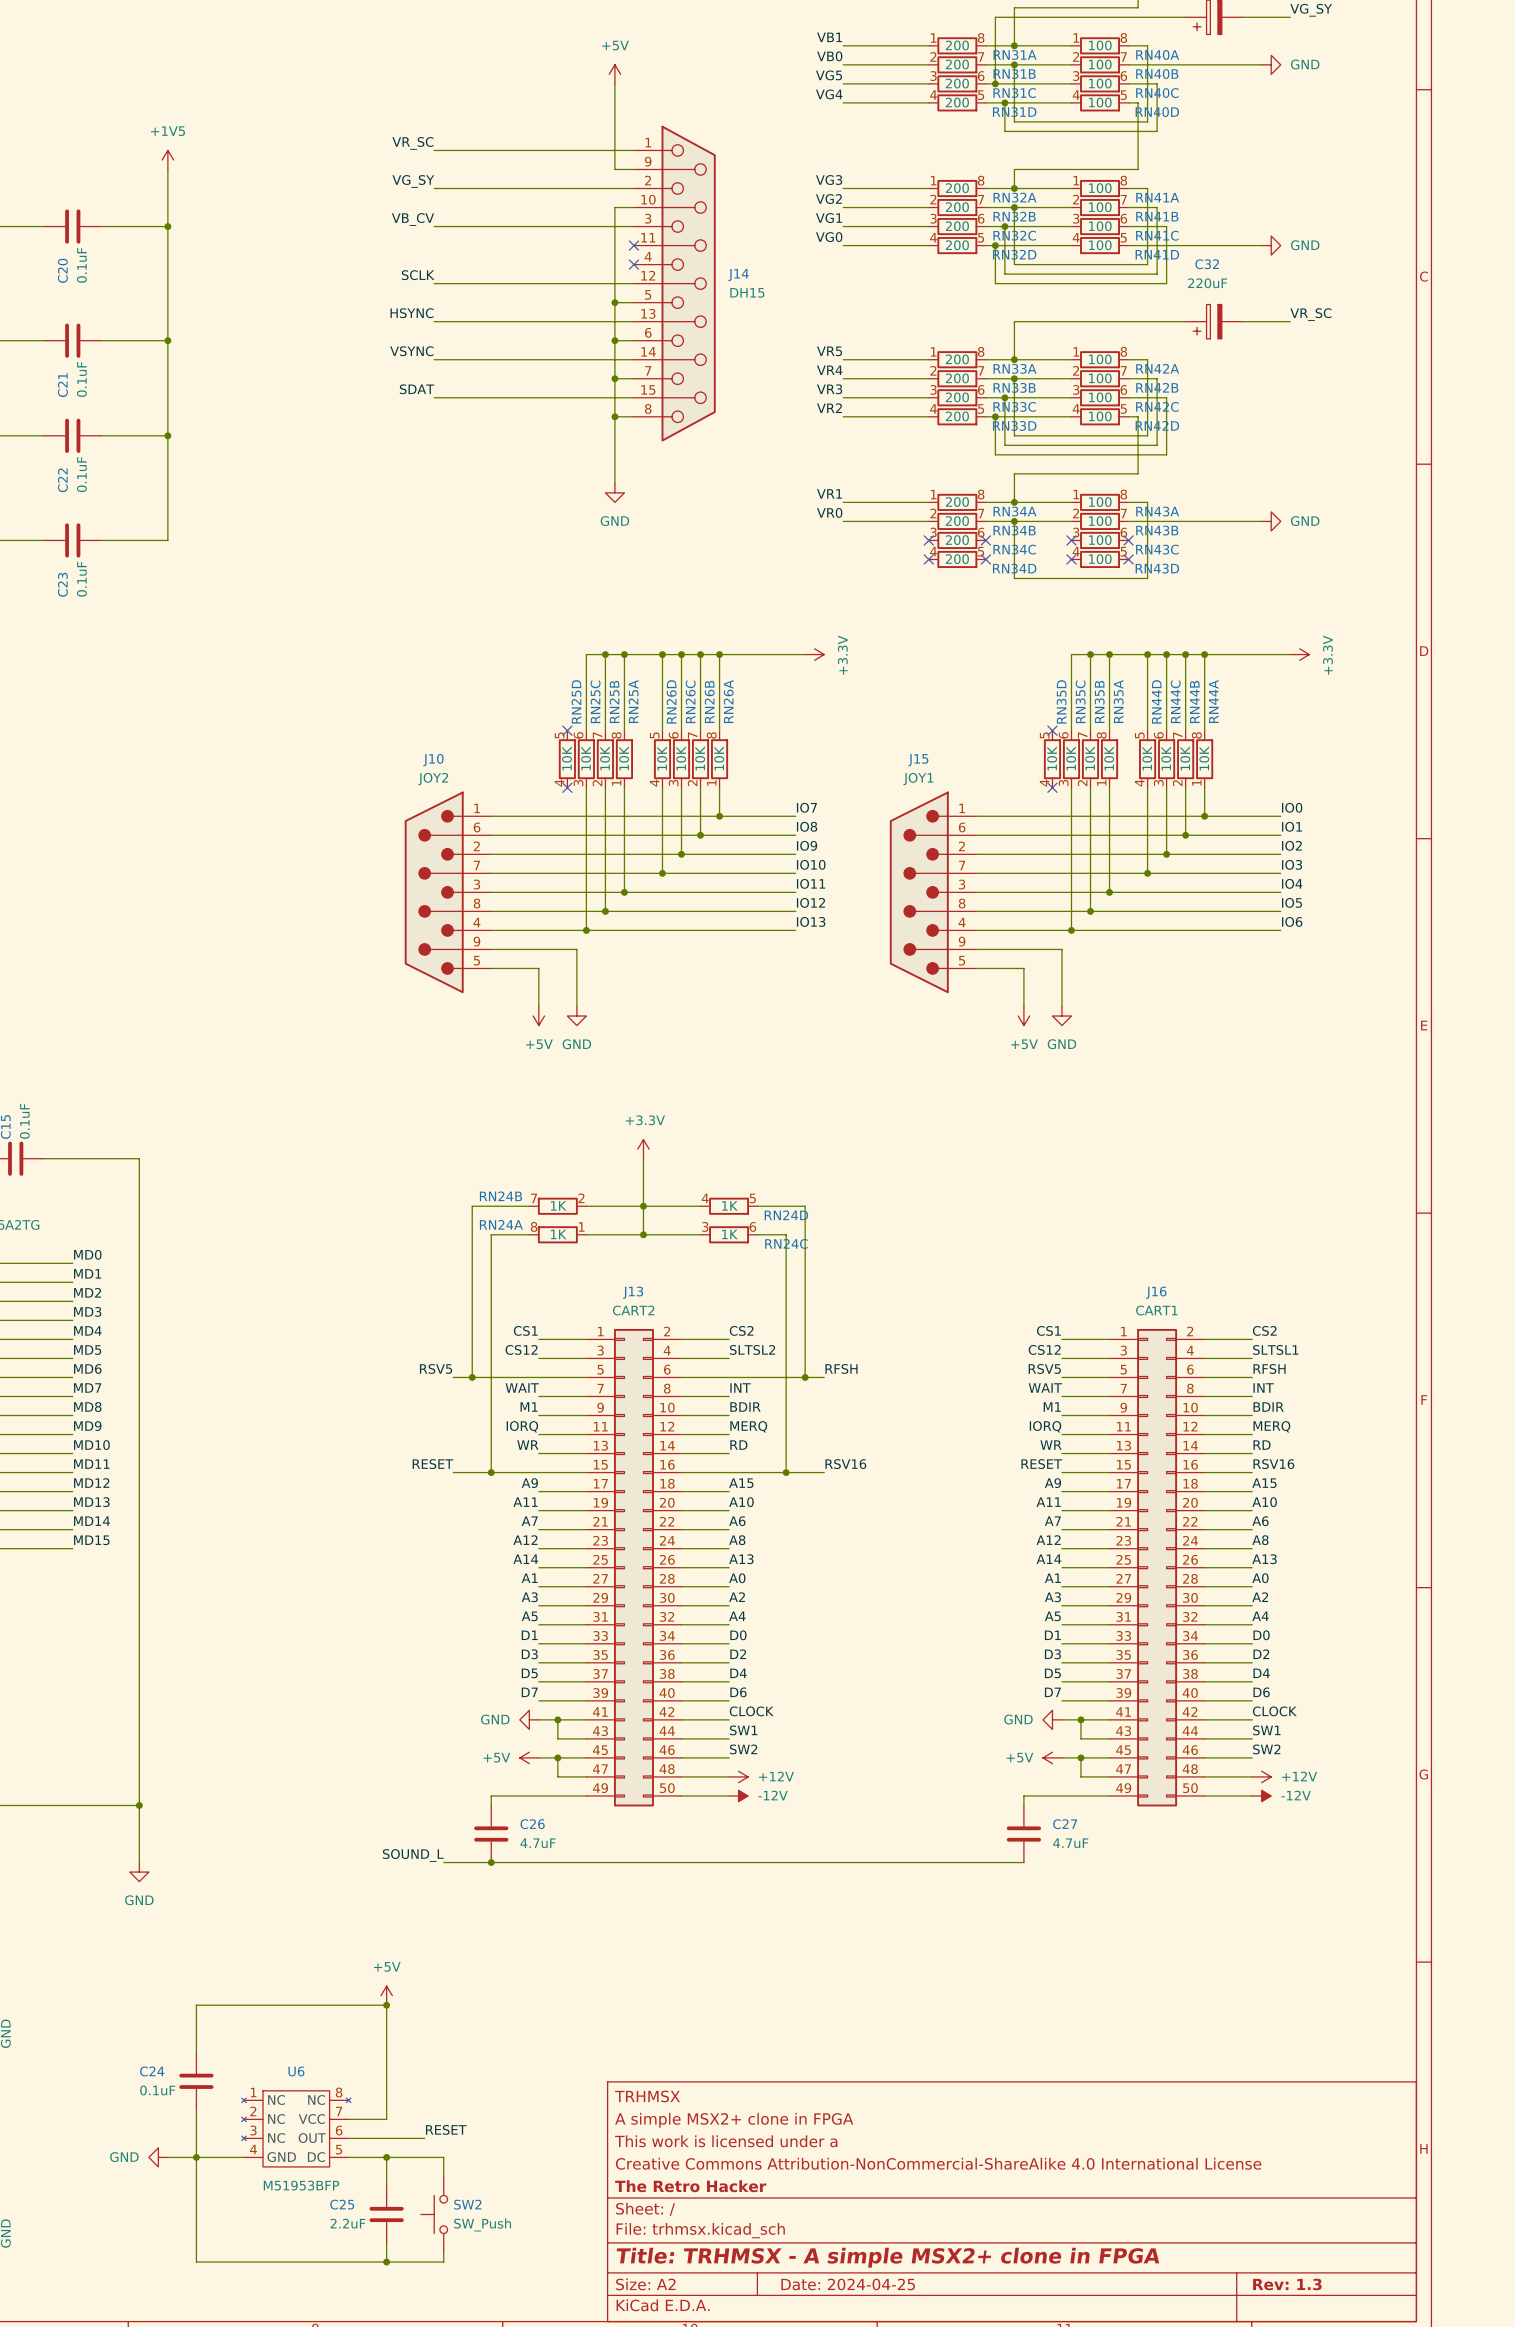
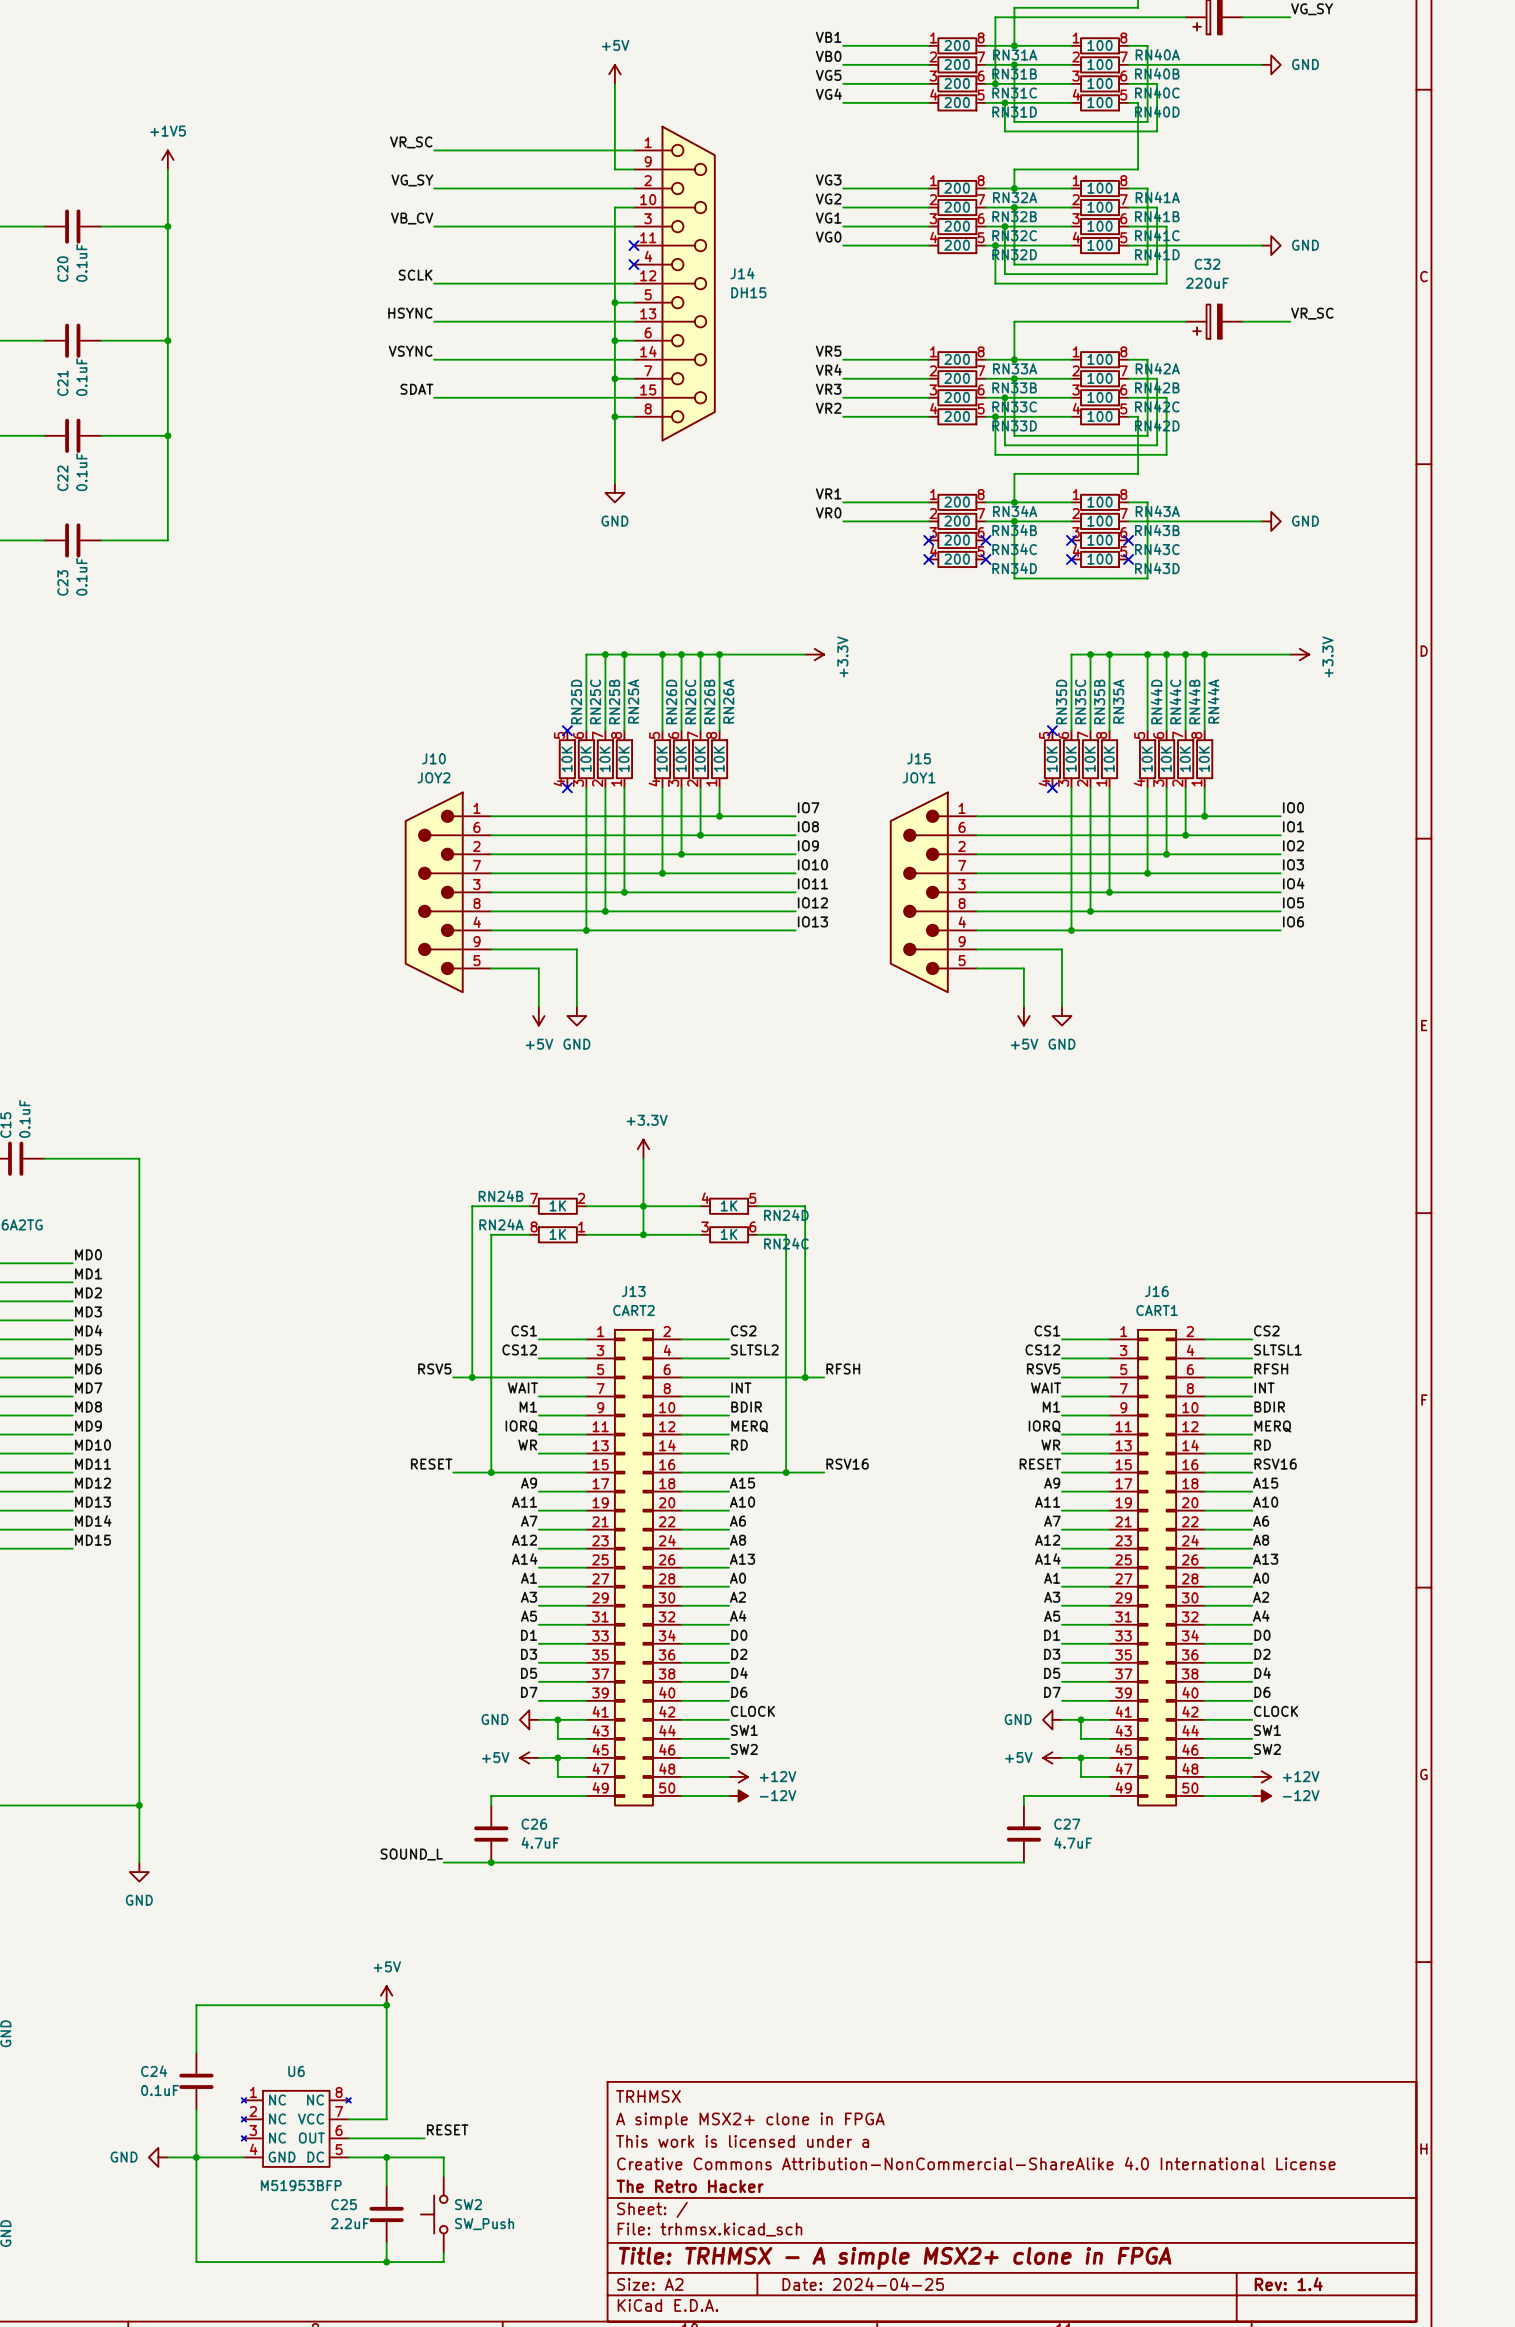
title block: Rev: 1.3 (1287, 2284) -> Rev: 1.4 (1288, 2284)

